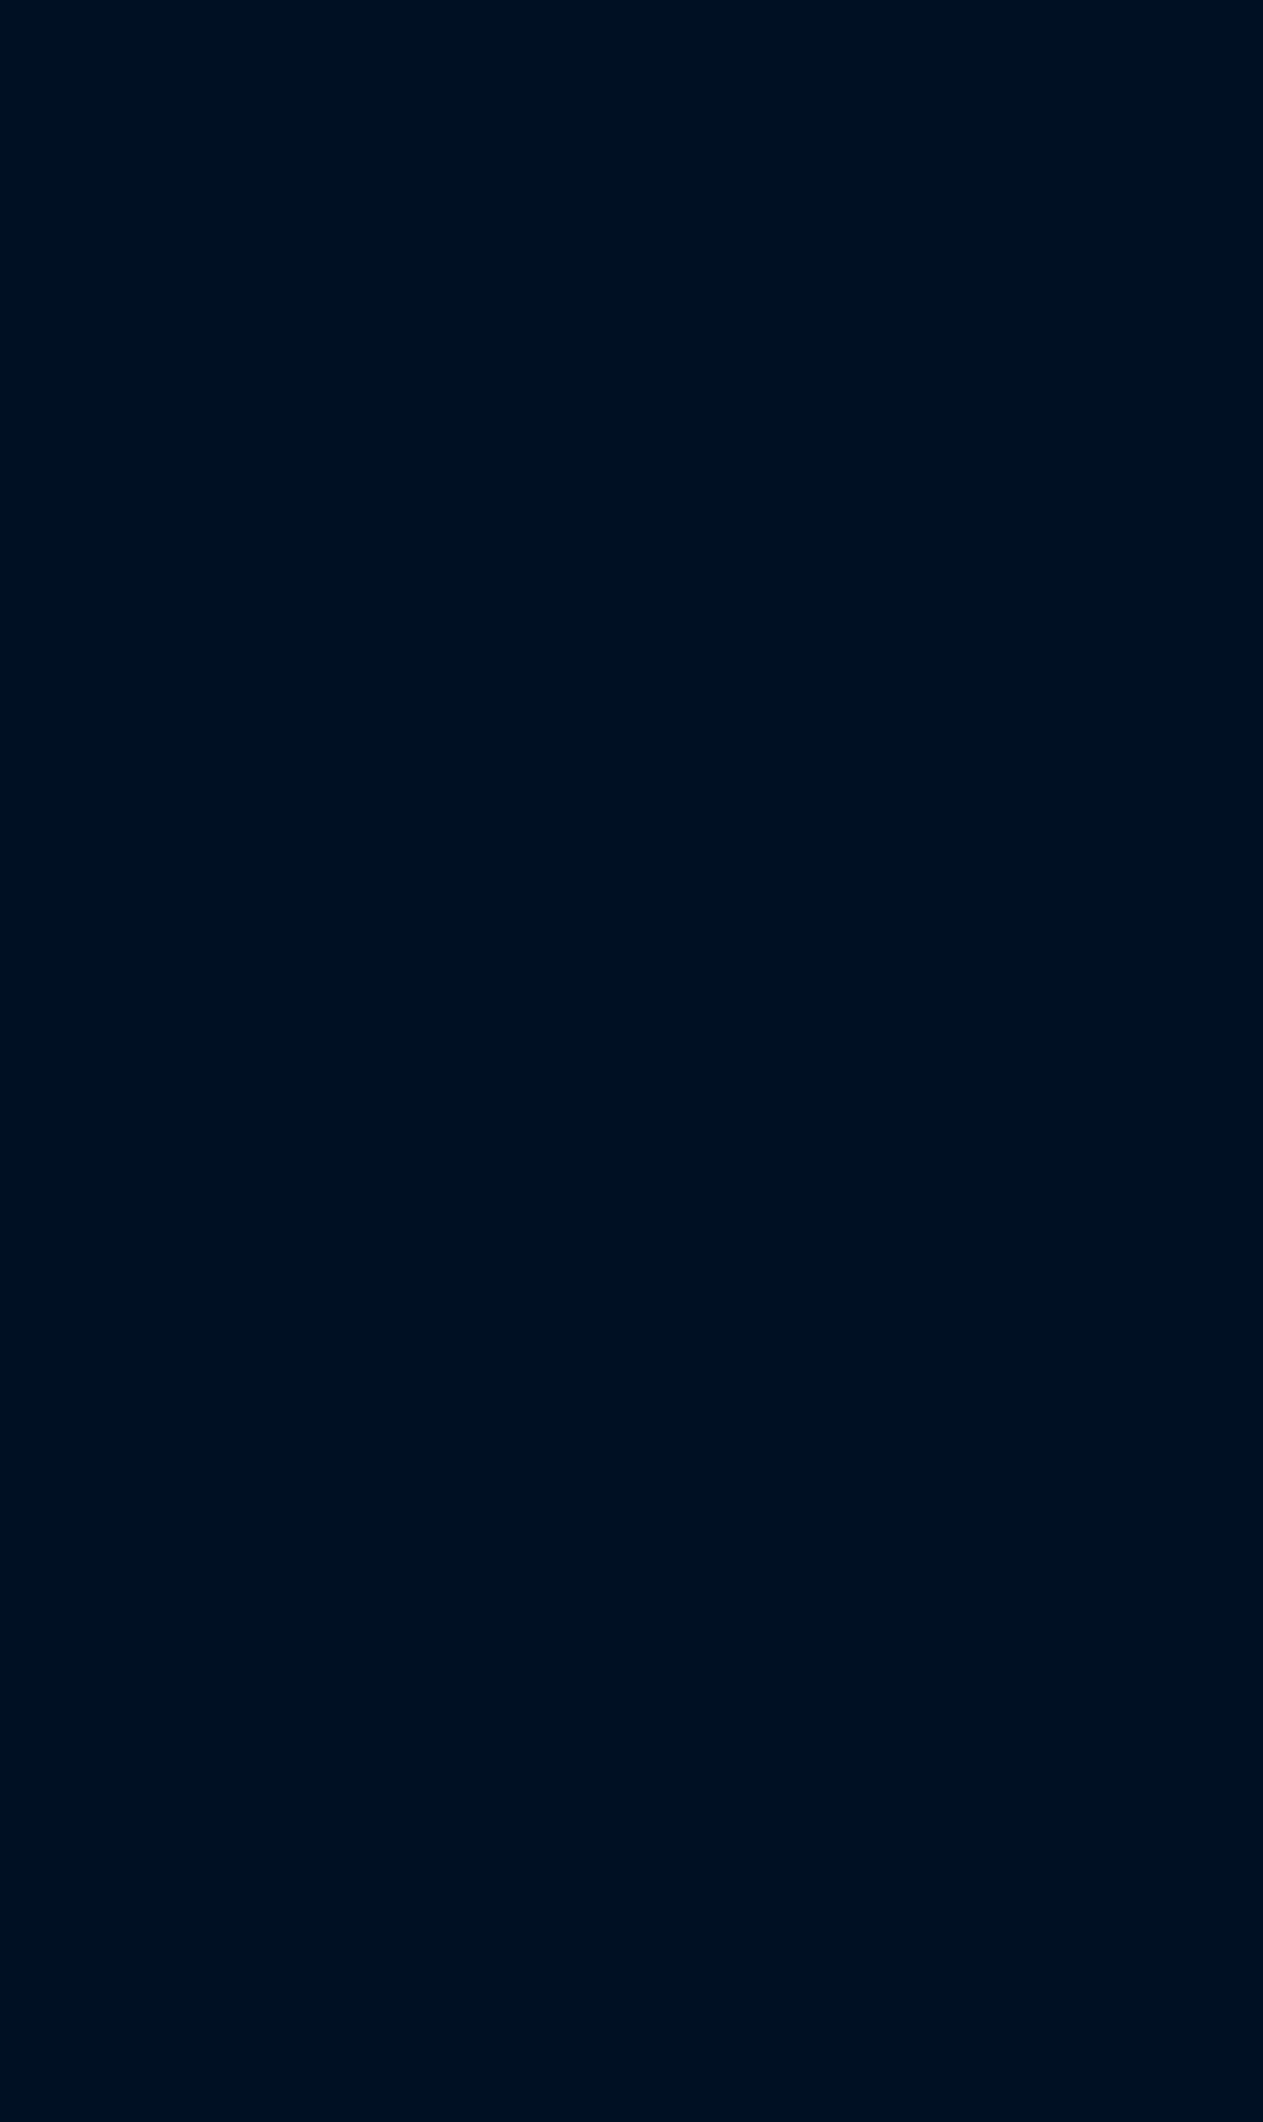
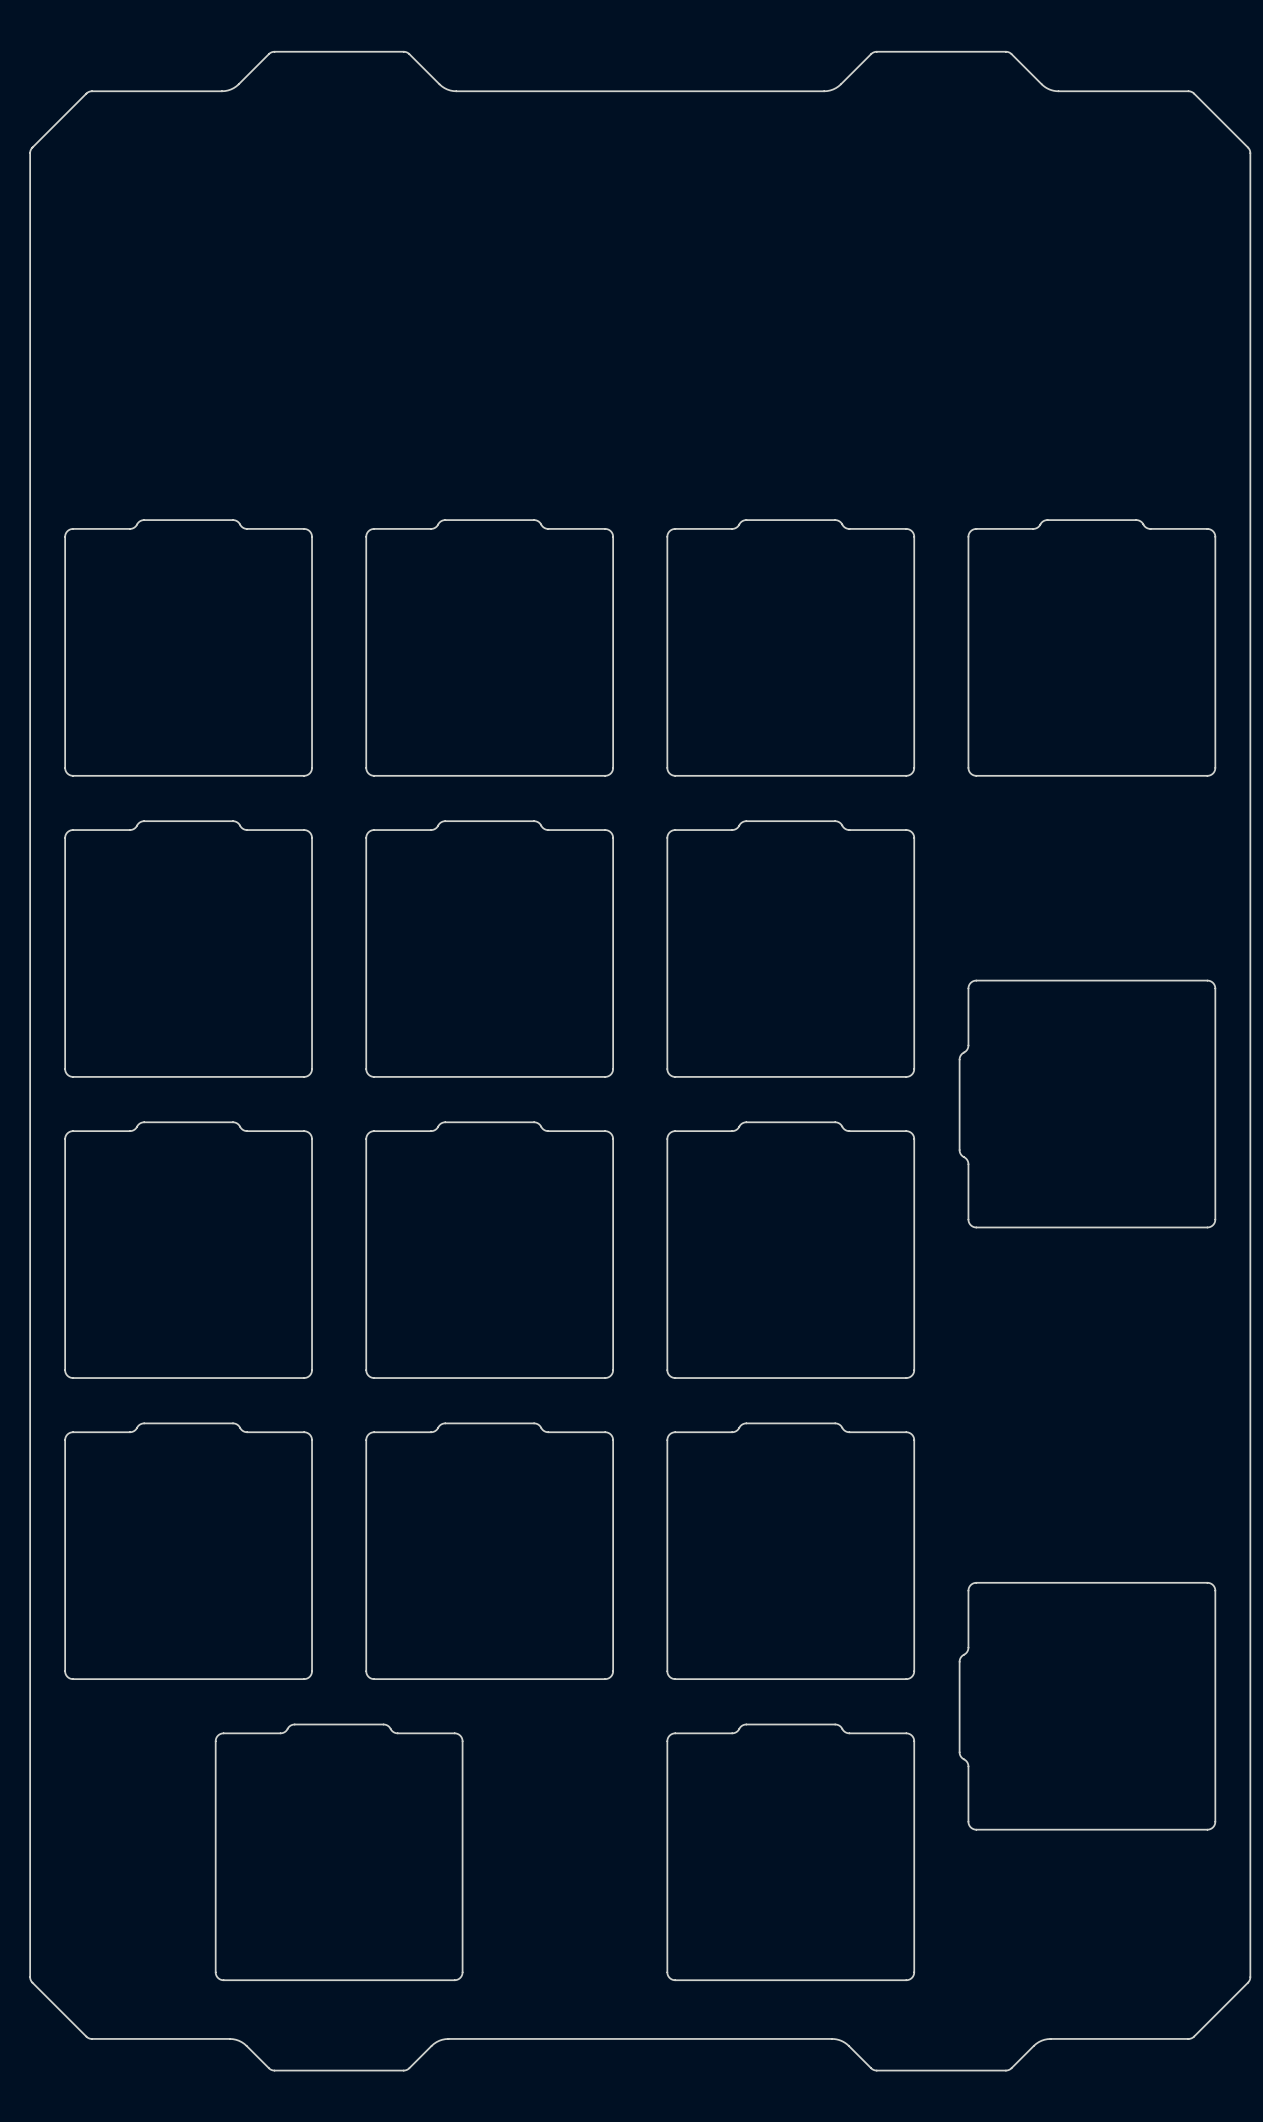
board edge: none -> (274, 51) (405, 51) (441, 86) (456, 91) (827, 91) (838, 86) (874, 52) (1006, 51) (1011, 54) (1043, 85) (1053, 90) (1191, 91) (1249, 150) (1250, 1977) (1248, 1982) (1191, 2038) (1047, 2039) (1036, 2043) (1011, 2068) (1005, 2070) (875, 2070) (845, 2042) (832, 2038) (448, 2038) (433, 2043) (405, 2070) (273, 2070) (269, 2068) (244, 2043) (232, 2039) (88, 2038) (30, 1980) (30, 152) (32, 147) (88, 91) (228, 90) (236, 86) (268, 54) (274, 51)
board edge: none -> (144, 520) (233, 520) (246, 528) (304, 528) (310, 532) (312, 767) (308, 774) (73, 775) (66, 771) (65, 534) (72, 529) (131, 528) (144, 520)
board edge: none -> (445, 520) (534, 520) (547, 528) (605, 528) (612, 532) (613, 767) (609, 774) (374, 775) (367, 771) (366, 534) (373, 529) (432, 528) (445, 520)
board edge: none -> (746, 520) (836, 520) (848, 528) (906, 528) (913, 532) (914, 767) (910, 774) (675, 775) (668, 771) (667, 534) (674, 529) (733, 528) (746, 520)
board edge: none -> (1047, 520) (1137, 520) (1149, 528) (1207, 528) (1214, 532) (1215, 767) (1211, 774) (976, 775) (969, 771) (968, 534) (975, 529) (1035, 528) (1047, 520)
board edge: none -> (144, 821) (233, 821) (246, 829) (304, 830) (310, 833) (312, 1069) (308, 1075) (73, 1076) (66, 1072) (65, 835) (72, 830) (131, 829) (144, 821)
board edge: none -> (445, 821) (534, 821) (547, 829) (605, 830) (612, 833) (613, 1069) (609, 1075) (374, 1076) (367, 1072) (366, 835) (373, 830) (432, 829) (445, 821)
board edge: none -> (746, 821) (836, 821) (848, 829) (906, 830) (913, 833) (914, 1069) (910, 1075) (675, 1076) (668, 1072) (667, 835) (674, 830) (733, 829) (746, 821)
board edge: none -> (976, 980) (1207, 980) (1213, 982) (1215, 988) (1215, 1219) (1213, 1225) (1207, 1227) (976, 1227) (970, 1225) (968, 1219) (968, 1163) (959, 1150) (959, 1059) (968, 1046) (968, 986) (971, 982) (976, 980)
board edge: none -> (144, 1122) (233, 1122) (246, 1131) (304, 1131) (310, 1135) (312, 1370) (308, 1376) (73, 1378) (66, 1374) (65, 1136) (72, 1131) (131, 1130) (144, 1122)
board edge: none -> (445, 1122) (534, 1122) (547, 1131) (605, 1131) (612, 1135) (613, 1370) (609, 1376) (374, 1378) (367, 1374) (366, 1136) (373, 1131) (432, 1130) (445, 1122)
board edge: none -> (746, 1122) (836, 1122) (848, 1131) (906, 1131) (913, 1135) (914, 1370) (910, 1376) (675, 1378) (668, 1374) (667, 1136) (674, 1131) (733, 1130) (746, 1122)
board edge: none -> (144, 1423) (233, 1423) (246, 1432) (304, 1432) (310, 1436) (312, 1671) (308, 1678) (73, 1679) (66, 1675) (65, 1438) (72, 1432) (131, 1432) (144, 1423)
board edge: none -> (445, 1423) (534, 1423) (547, 1432) (605, 1432) (612, 1436) (613, 1671) (609, 1678) (374, 1679) (367, 1675) (366, 1438) (373, 1432) (432, 1432) (445, 1423)
board edge: none -> (746, 1423) (836, 1423) (848, 1432) (906, 1432) (913, 1436) (914, 1671) (910, 1678) (675, 1679) (668, 1675) (667, 1438) (674, 1432) (733, 1432) (746, 1423)
board edge: none -> (976, 1582) (1207, 1582) (1213, 1585) (1215, 1590) (1215, 1821) (1213, 1827) (1207, 1829) (976, 1829) (970, 1827) (968, 1821) (968, 1765) (959, 1753) (959, 1661) (968, 1648) (968, 1588) (971, 1584) (976, 1582)
board edge: none -> (294, 1724) (384, 1724) (396, 1733) (454, 1733) (461, 1737) (462, 1972) (458, 1979) (223, 1980) (216, 1976) (215, 1739) (222, 1733) (282, 1733) (294, 1724)
board edge: none -> (746, 1724) (836, 1724) (848, 1733) (906, 1733) (913, 1737) (914, 1972) (910, 1979) (675, 1980) (668, 1976) (667, 1739) (674, 1733) (733, 1733) (746, 1724)

